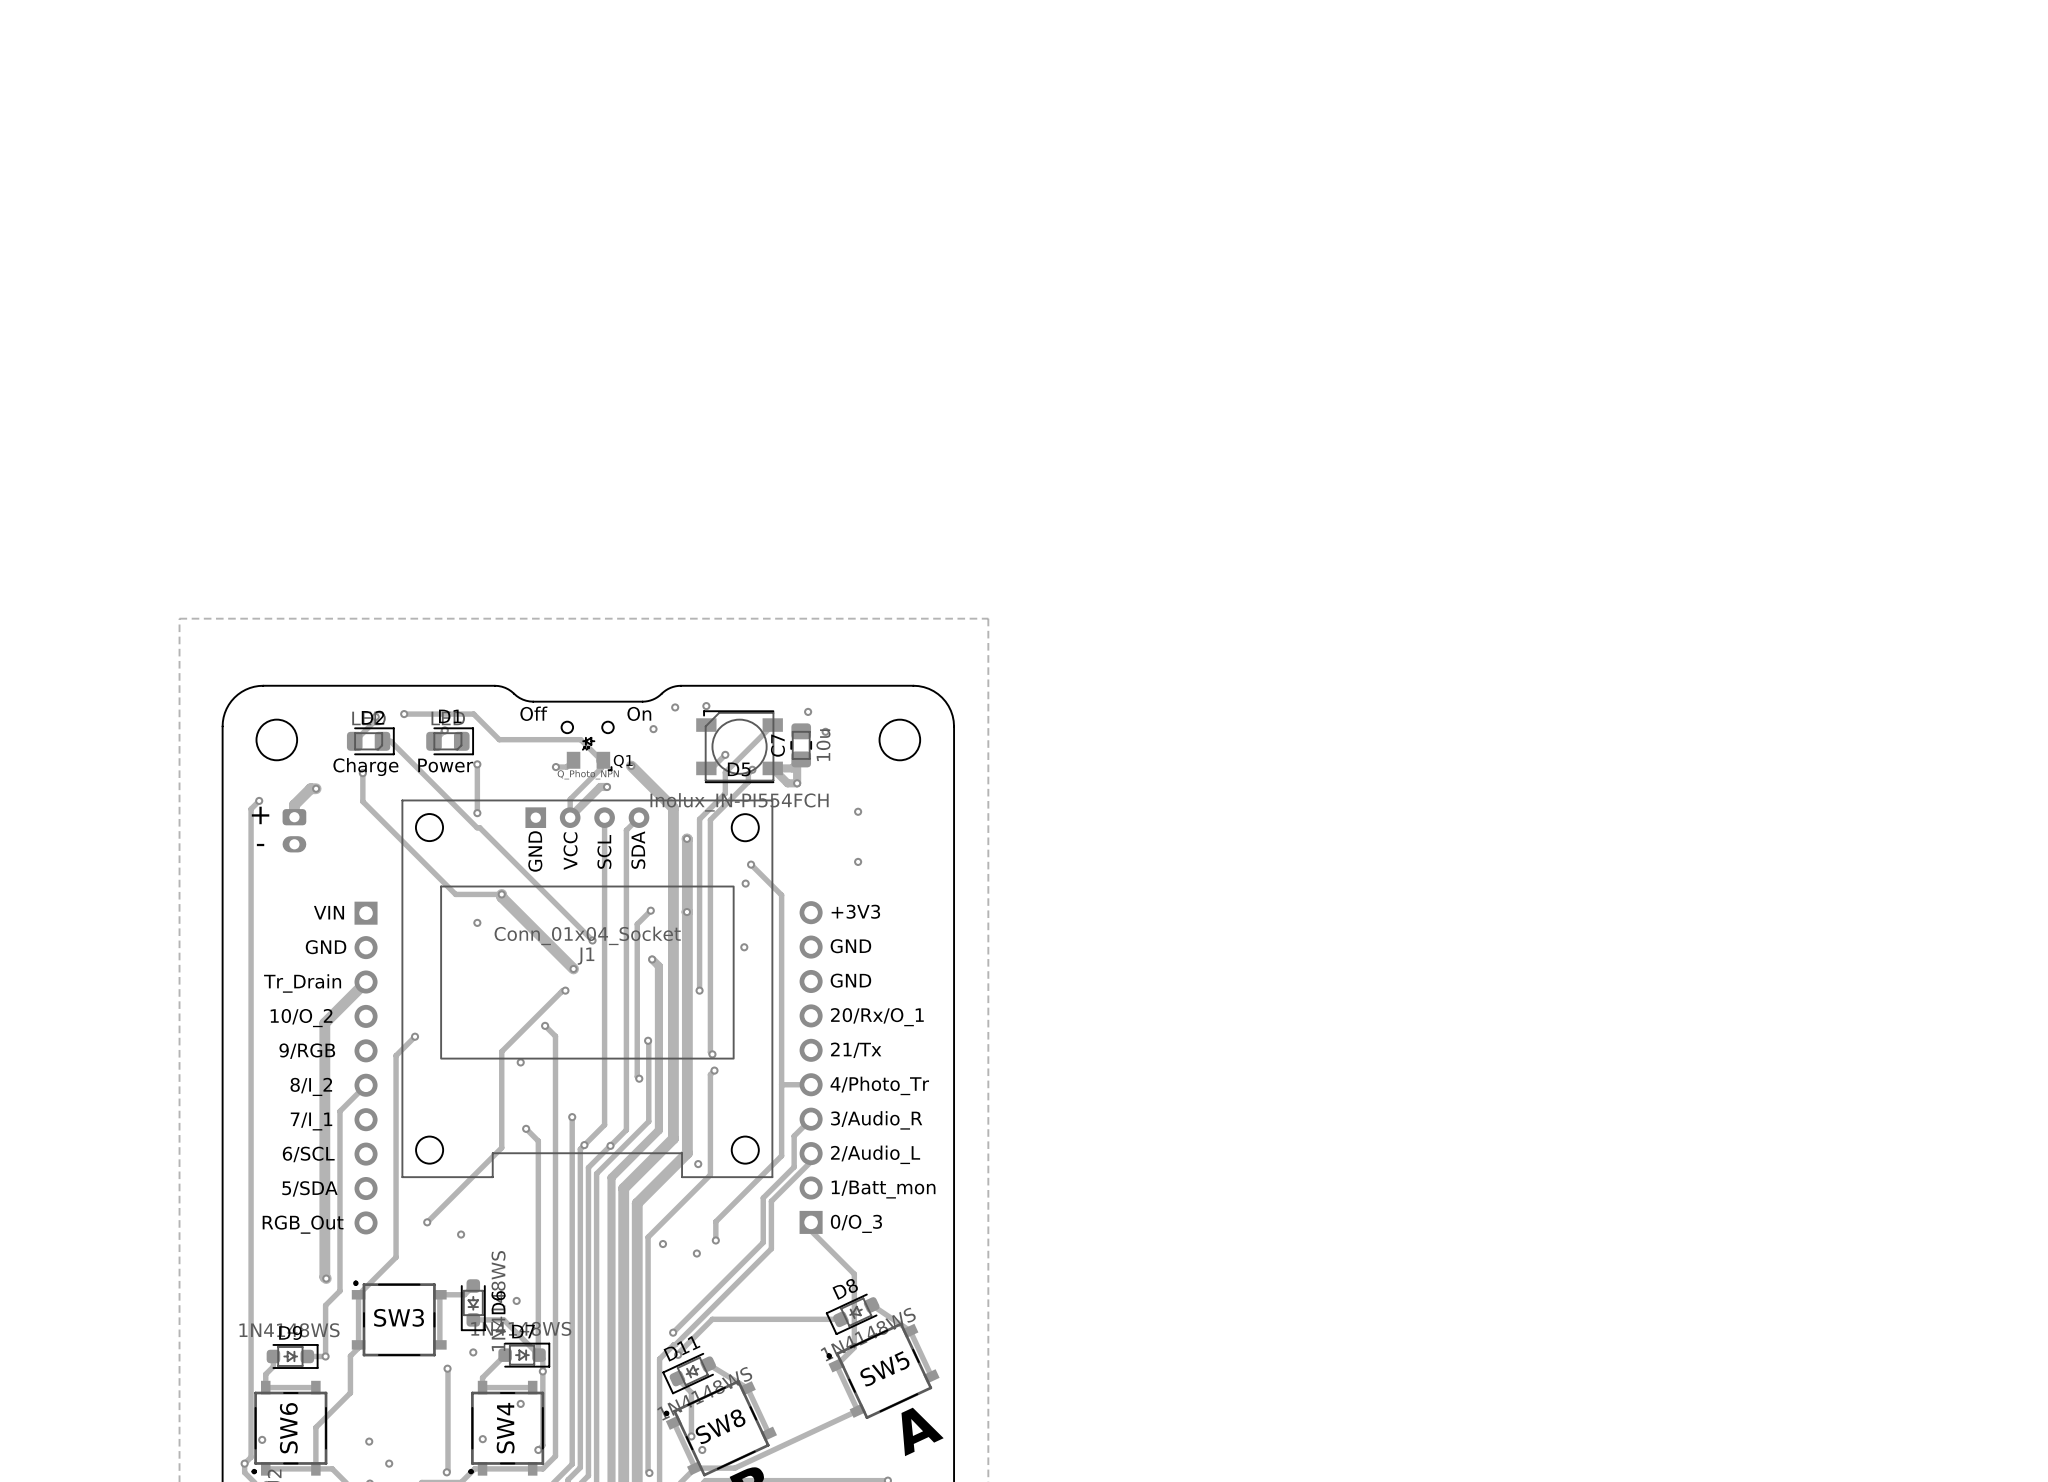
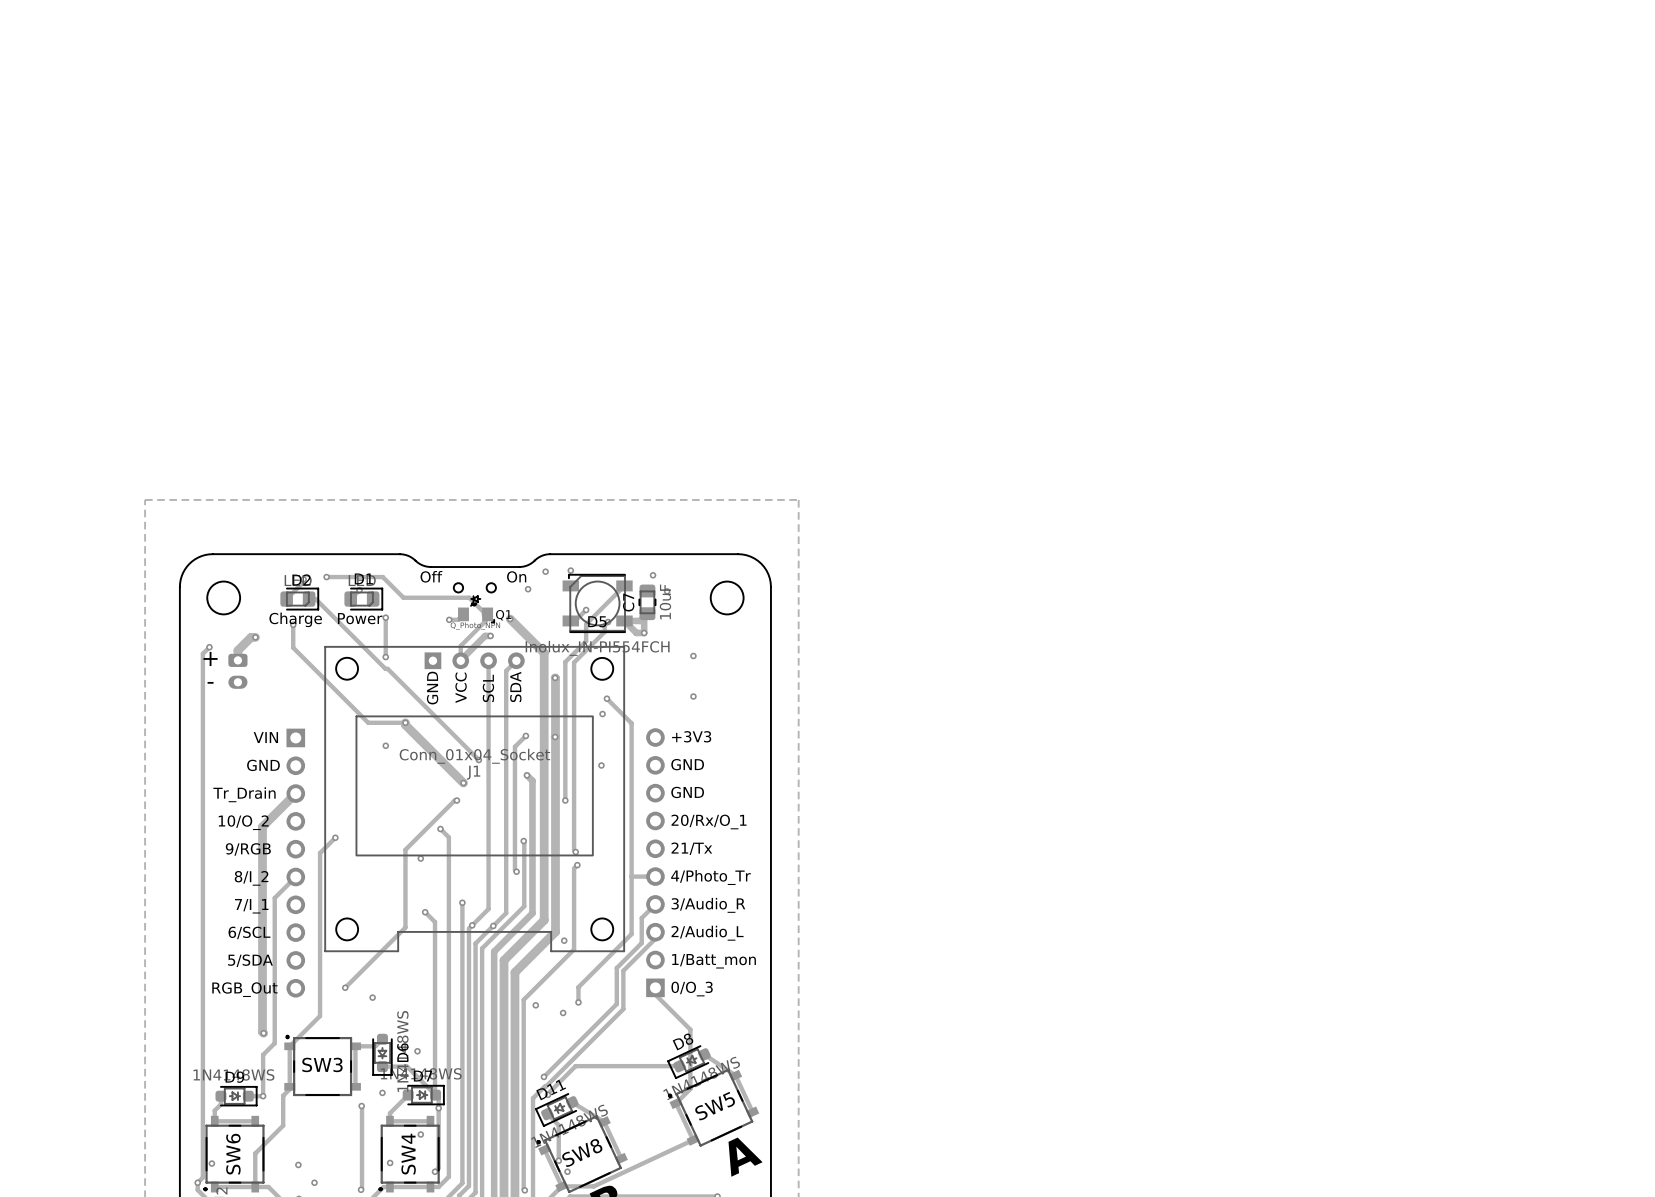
C7 value: 10u (823, 745) -> 10uF (665, 601)

